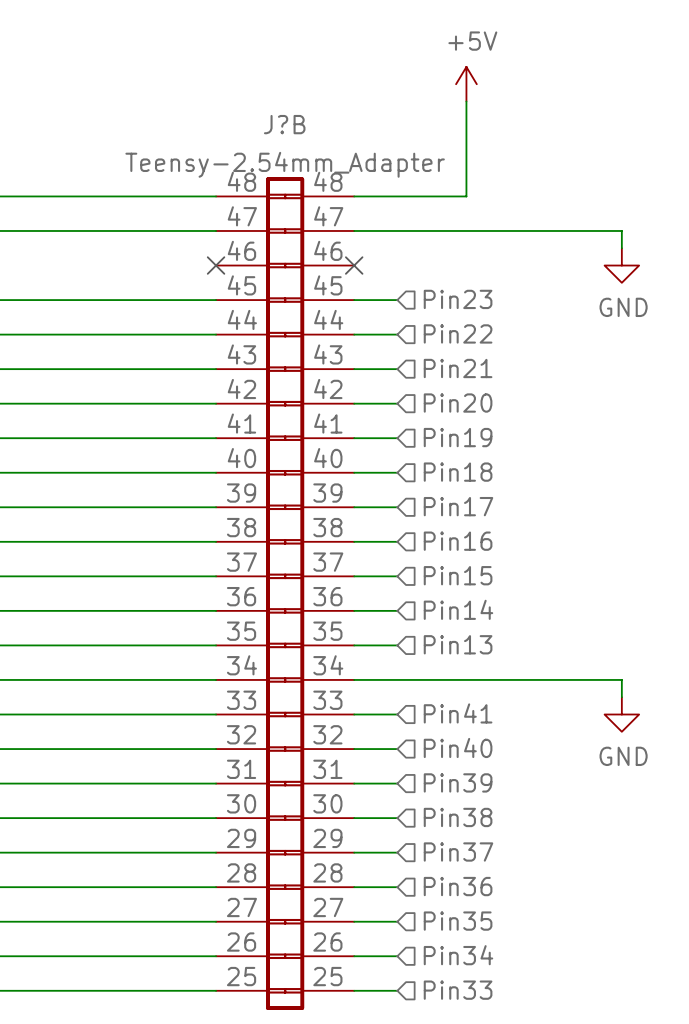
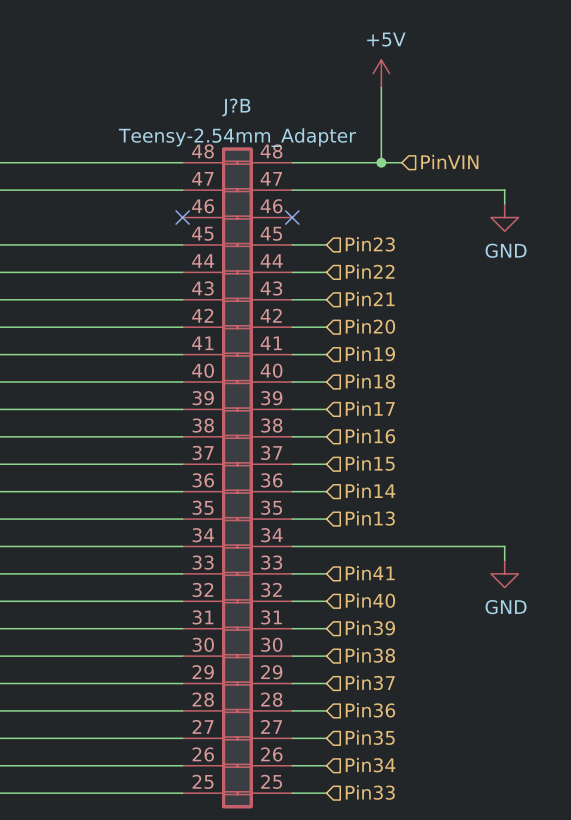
hierarchical label: none -> PinVIN (449, 161)
wire: none -> (381, 162) (401, 162)
junction: none -> (381, 162)

